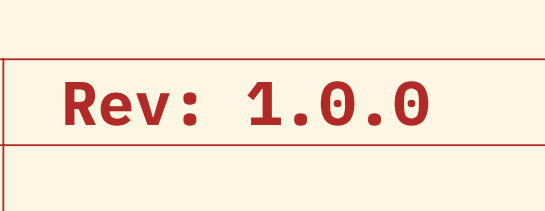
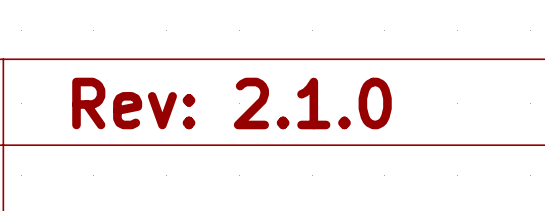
title block: Rev: 1.0.0 (246, 103) -> Rev: 2.1.0 (231, 103)

